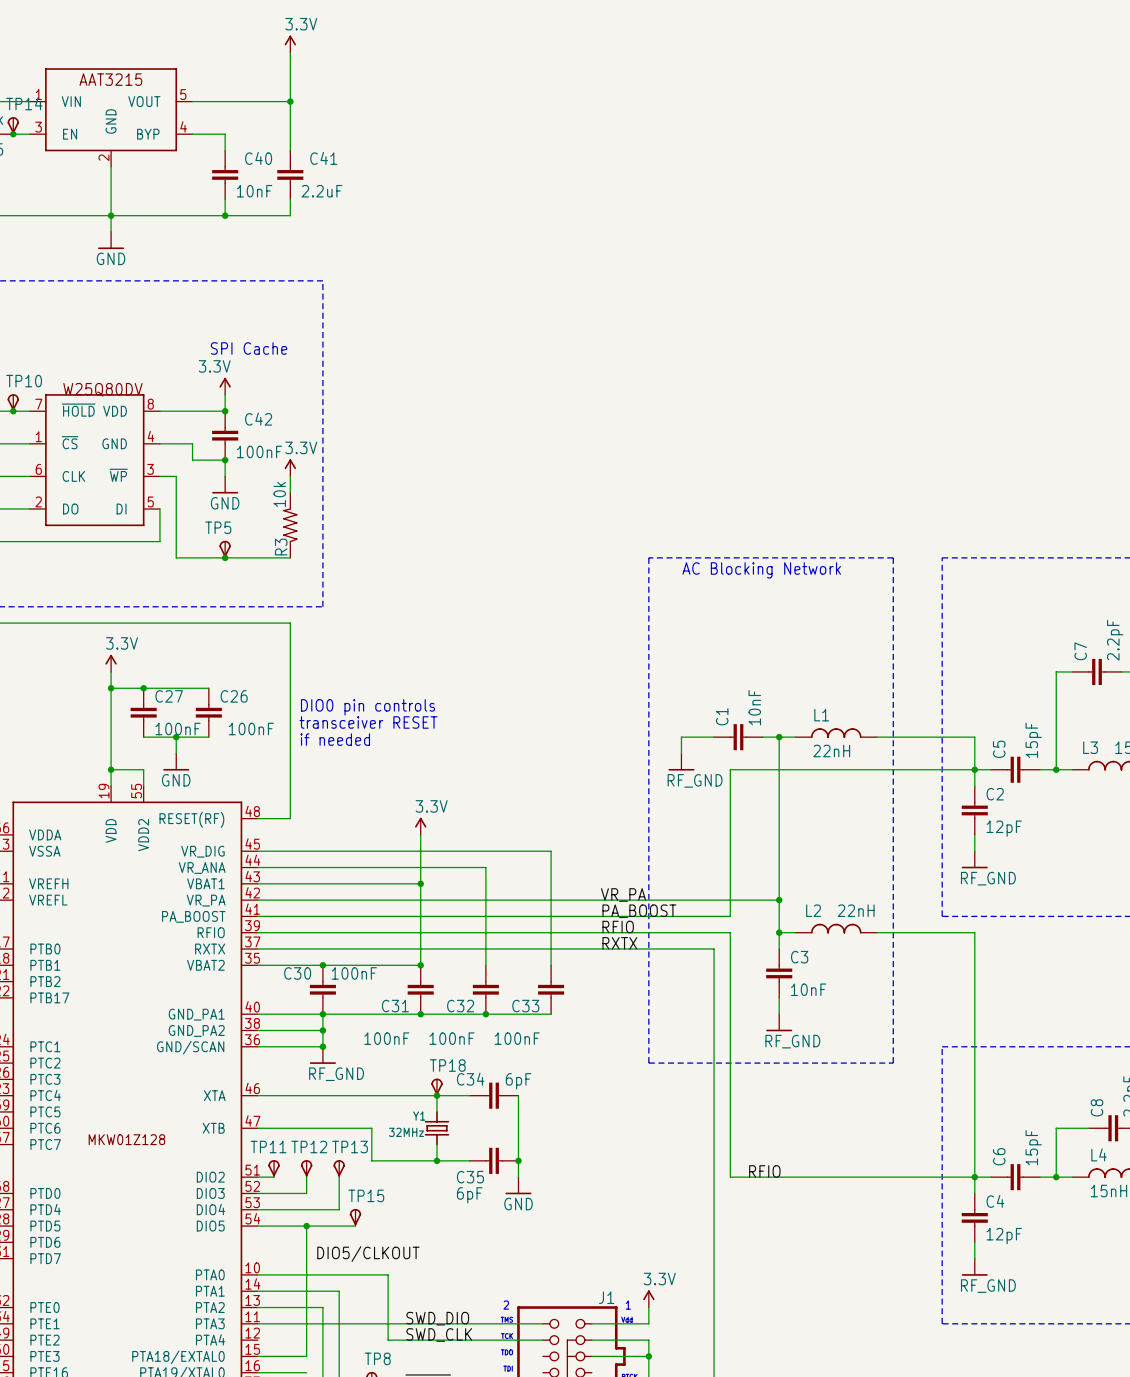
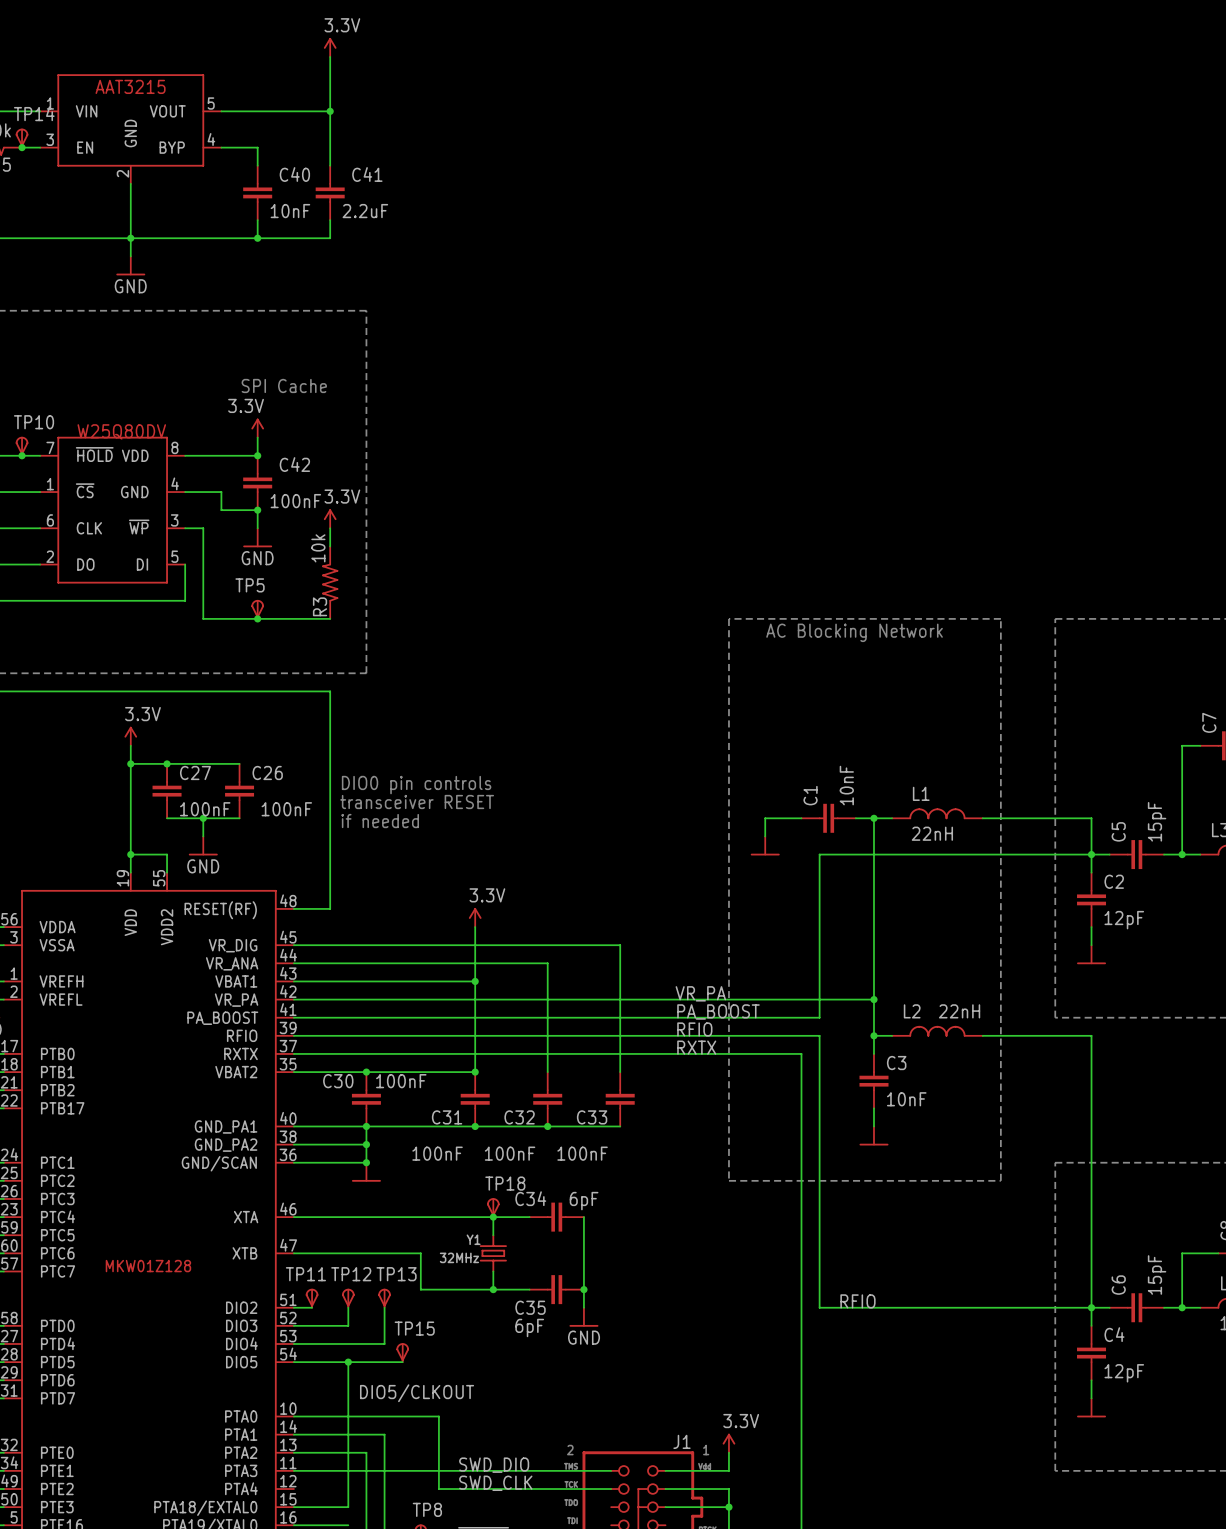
power symbol text: RF_GND (695, 780) -> none
power symbol text: RF_GND (988, 878) -> none
power symbol text: RF_GND (792, 1041) -> none
power symbol text: RF_GND (336, 1074) -> none
power symbol text: RF_GND (988, 1286) -> none

